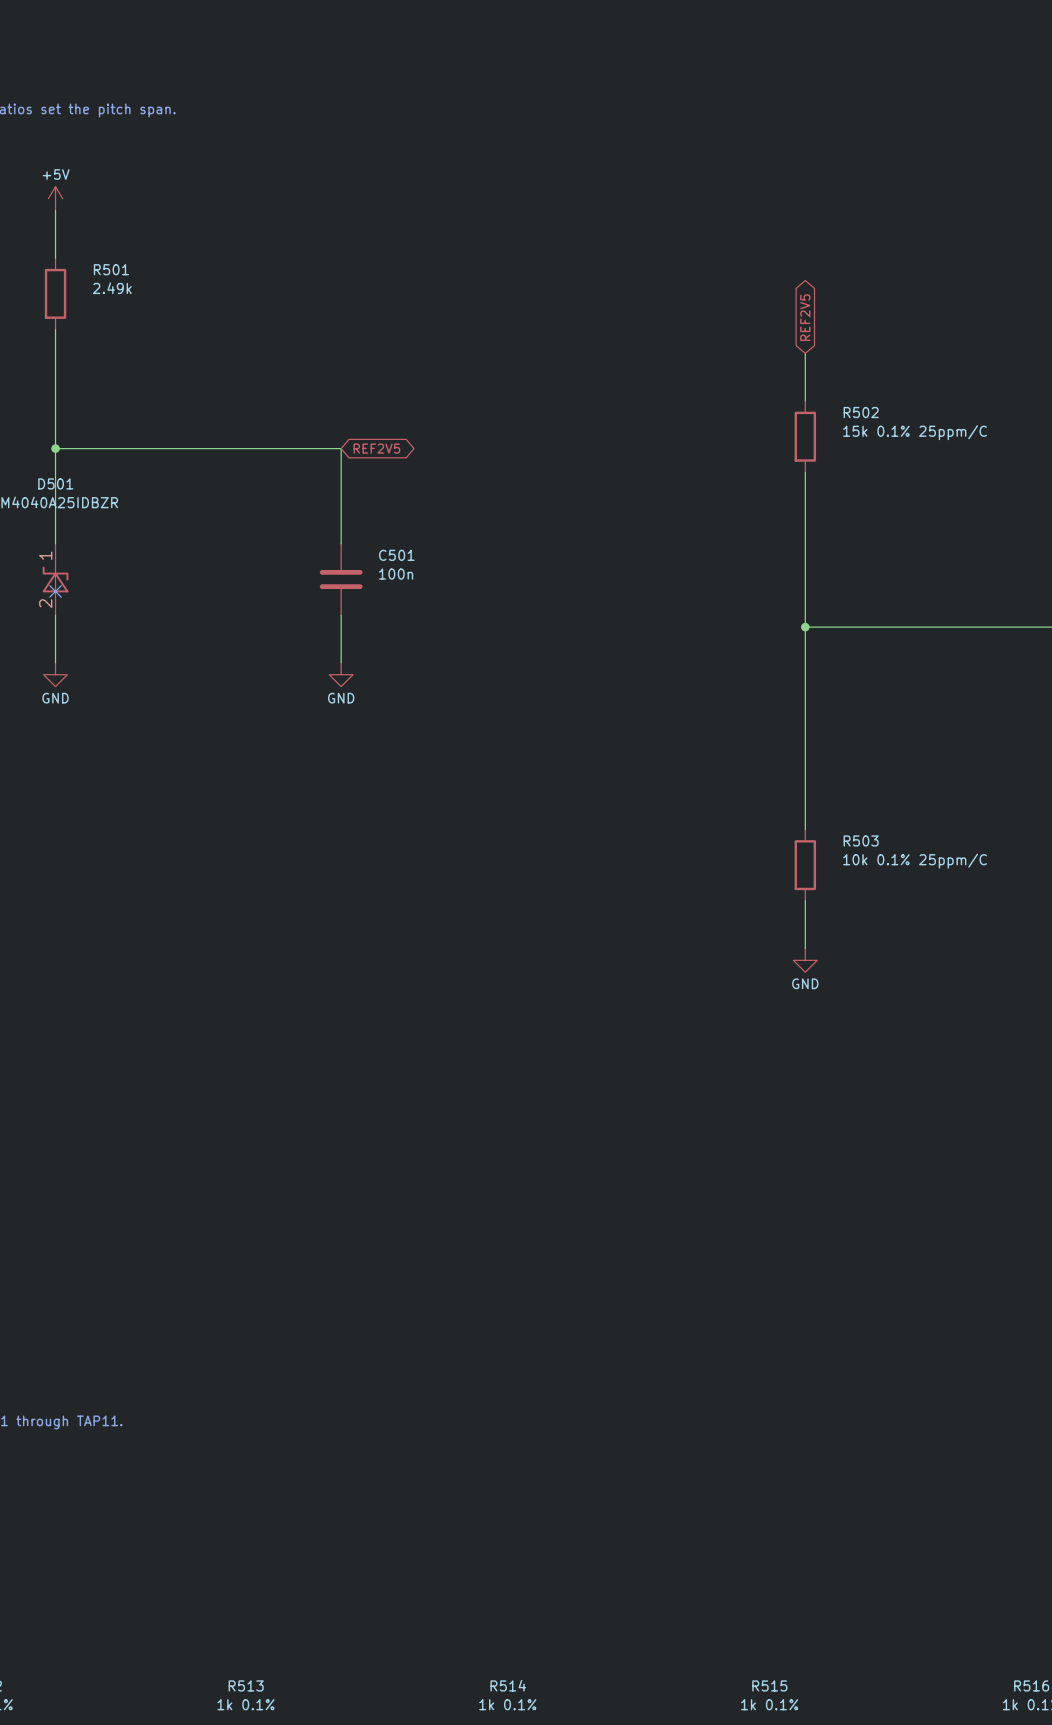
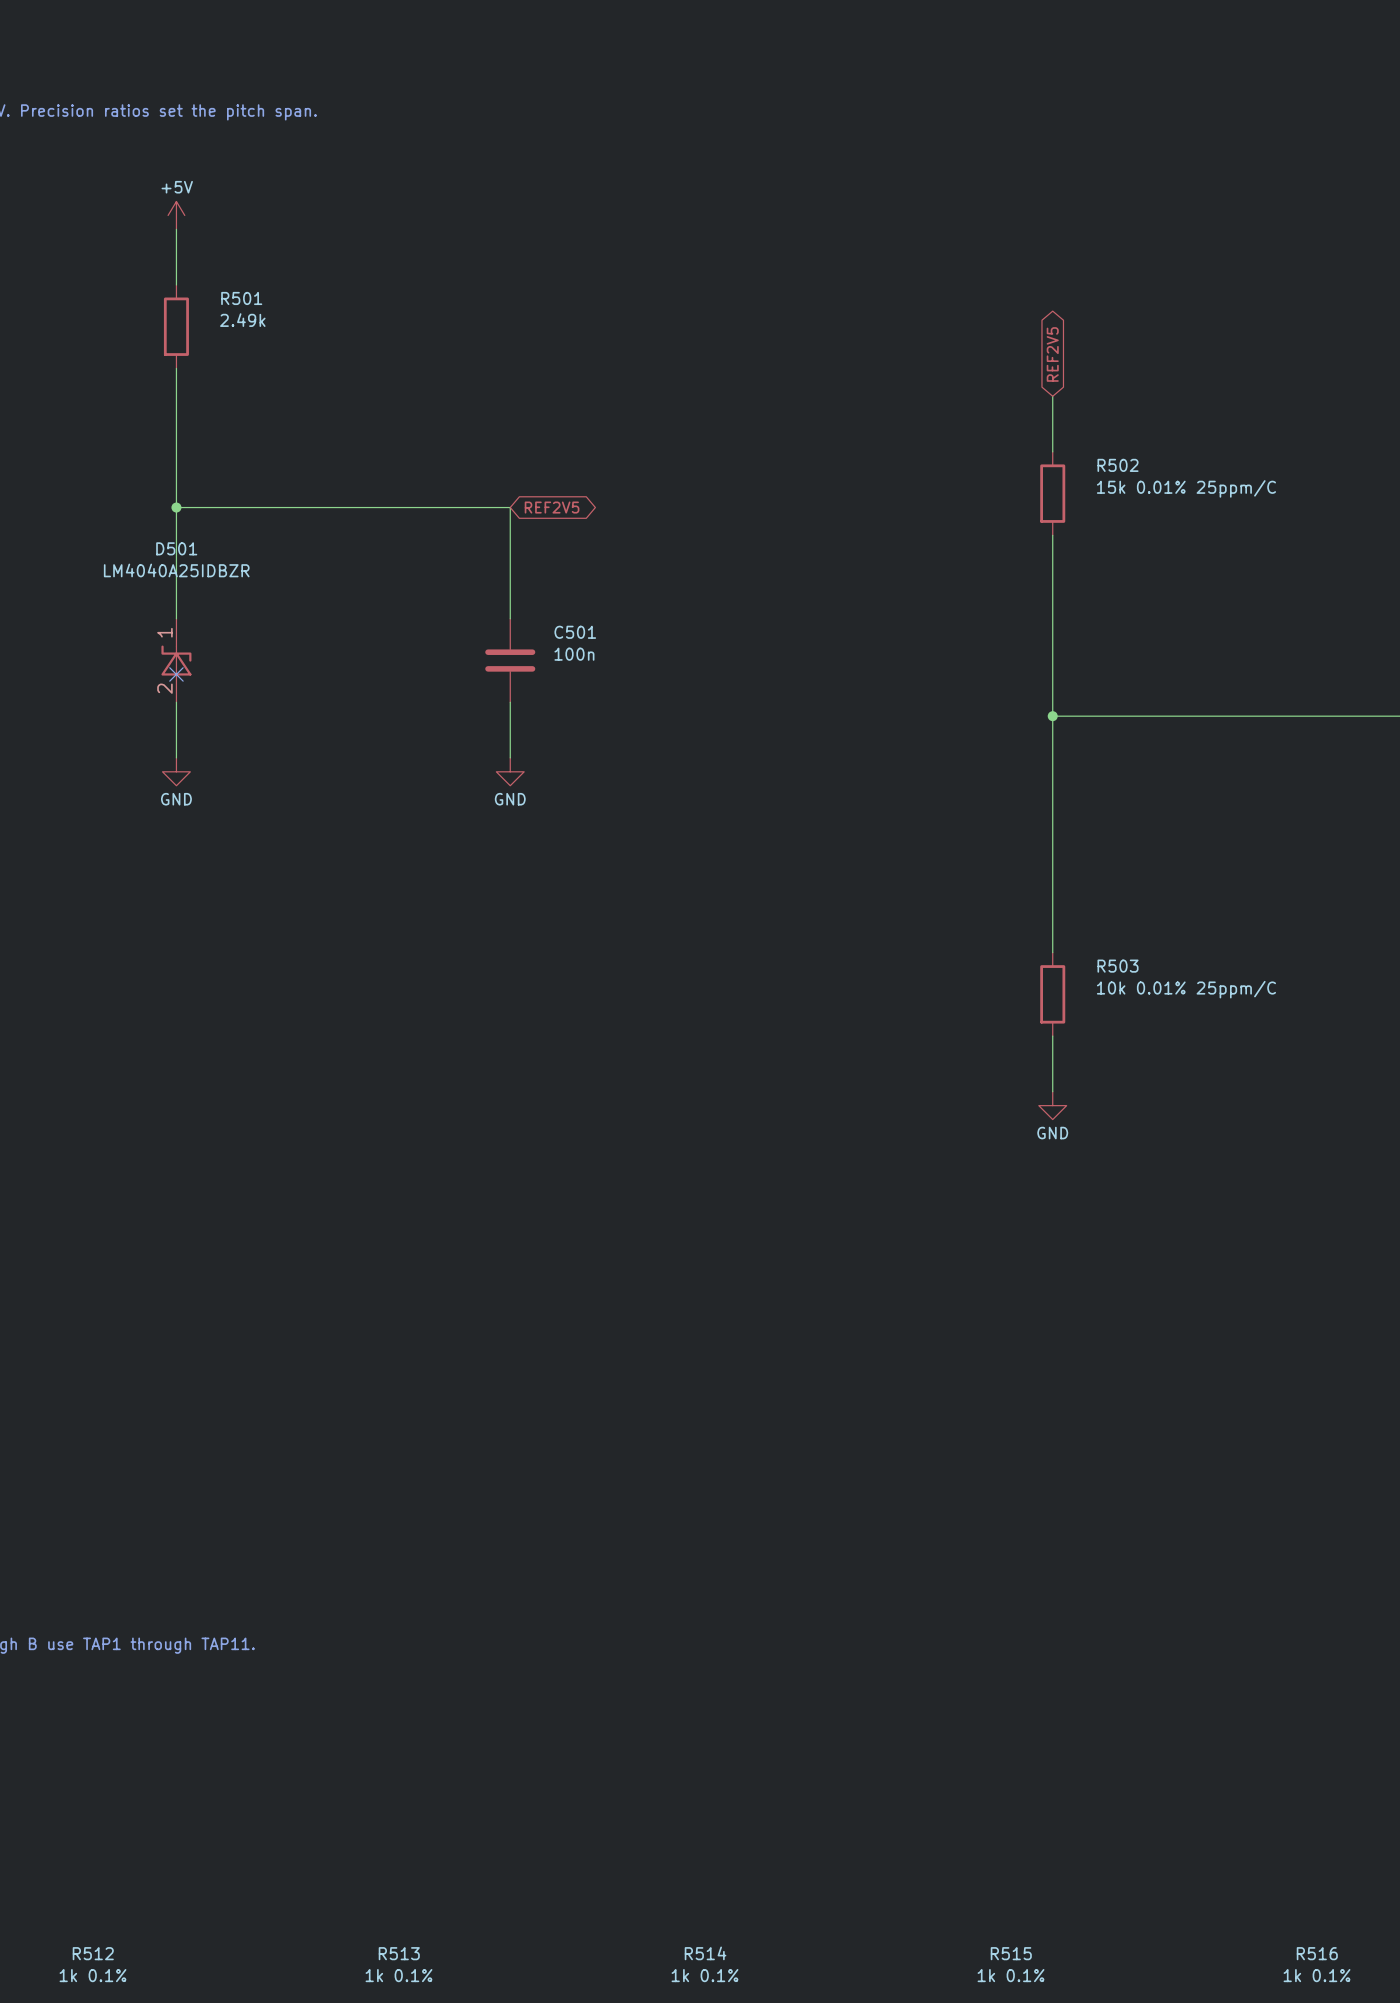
R502 value: 15k 0.1% 25ppm/C (915, 432) -> 15k 0.01% 25ppm/C (1186, 488)
R503 value: 10k 0.1% 25ppm/C (915, 861) -> 10k 0.01% 25ppm/C (1186, 989)

